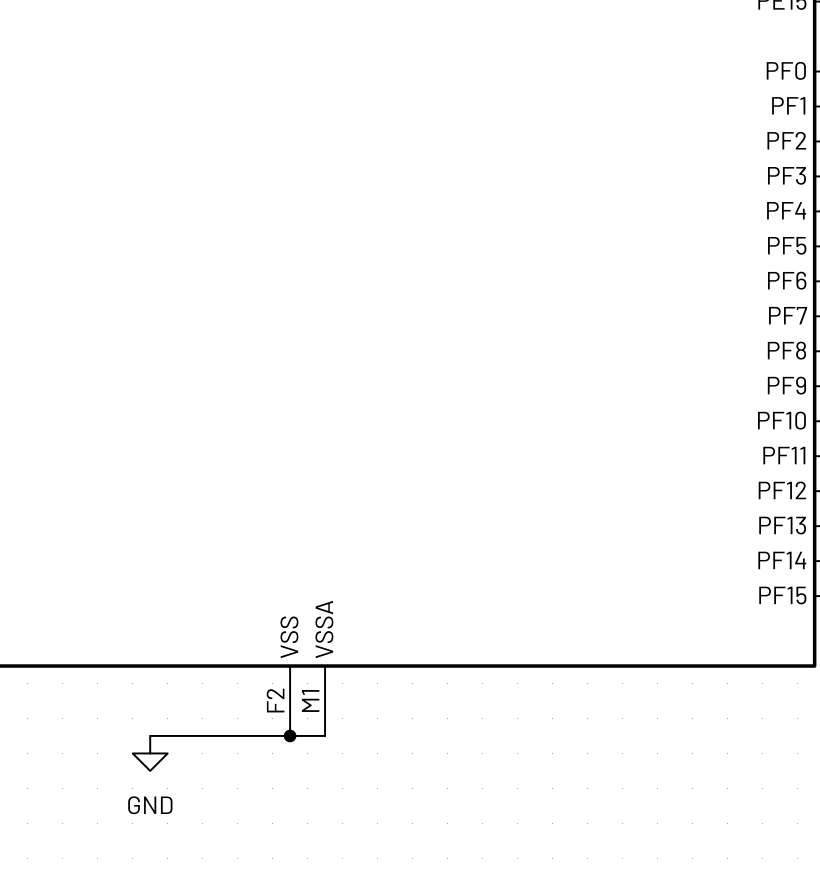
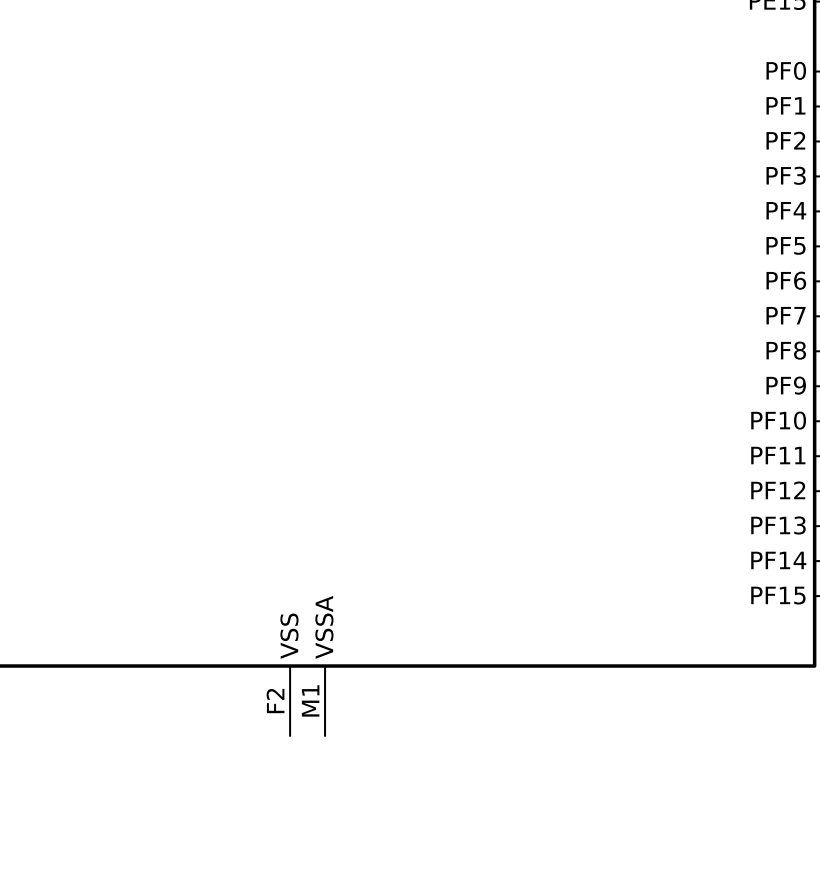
wire: (150, 735) (325, 735) -> none
junction: (290, 735) -> none
power symbol: GND (150, 753) -> none

